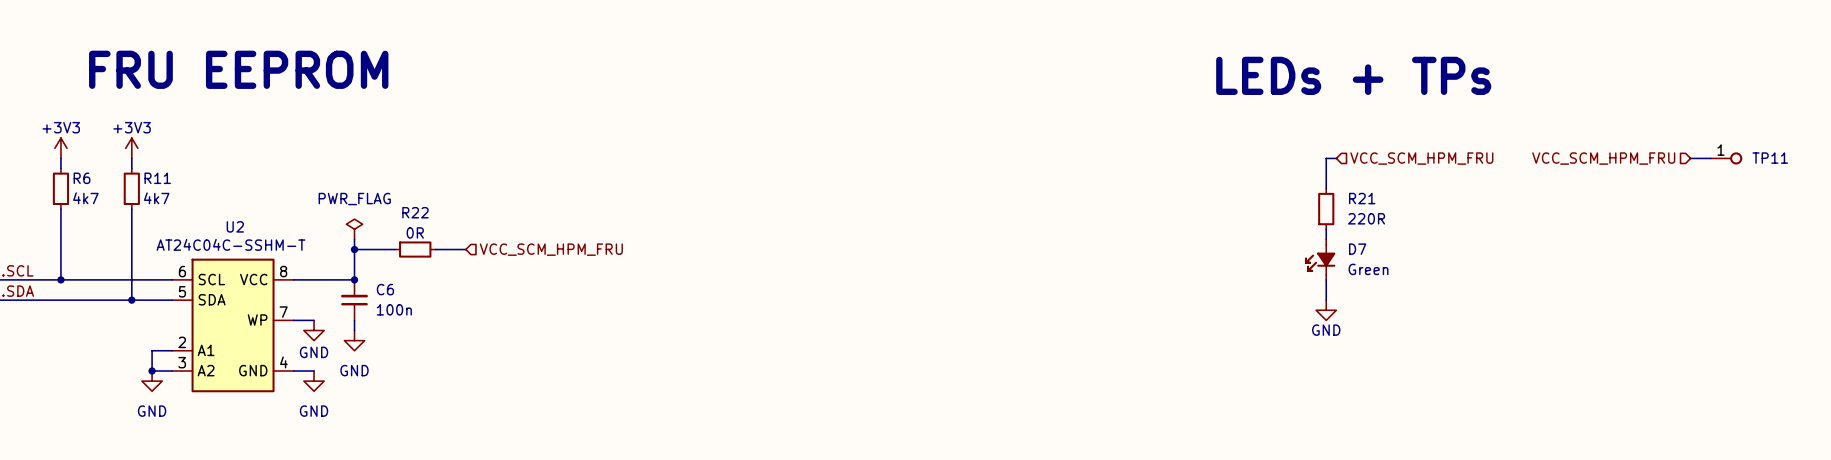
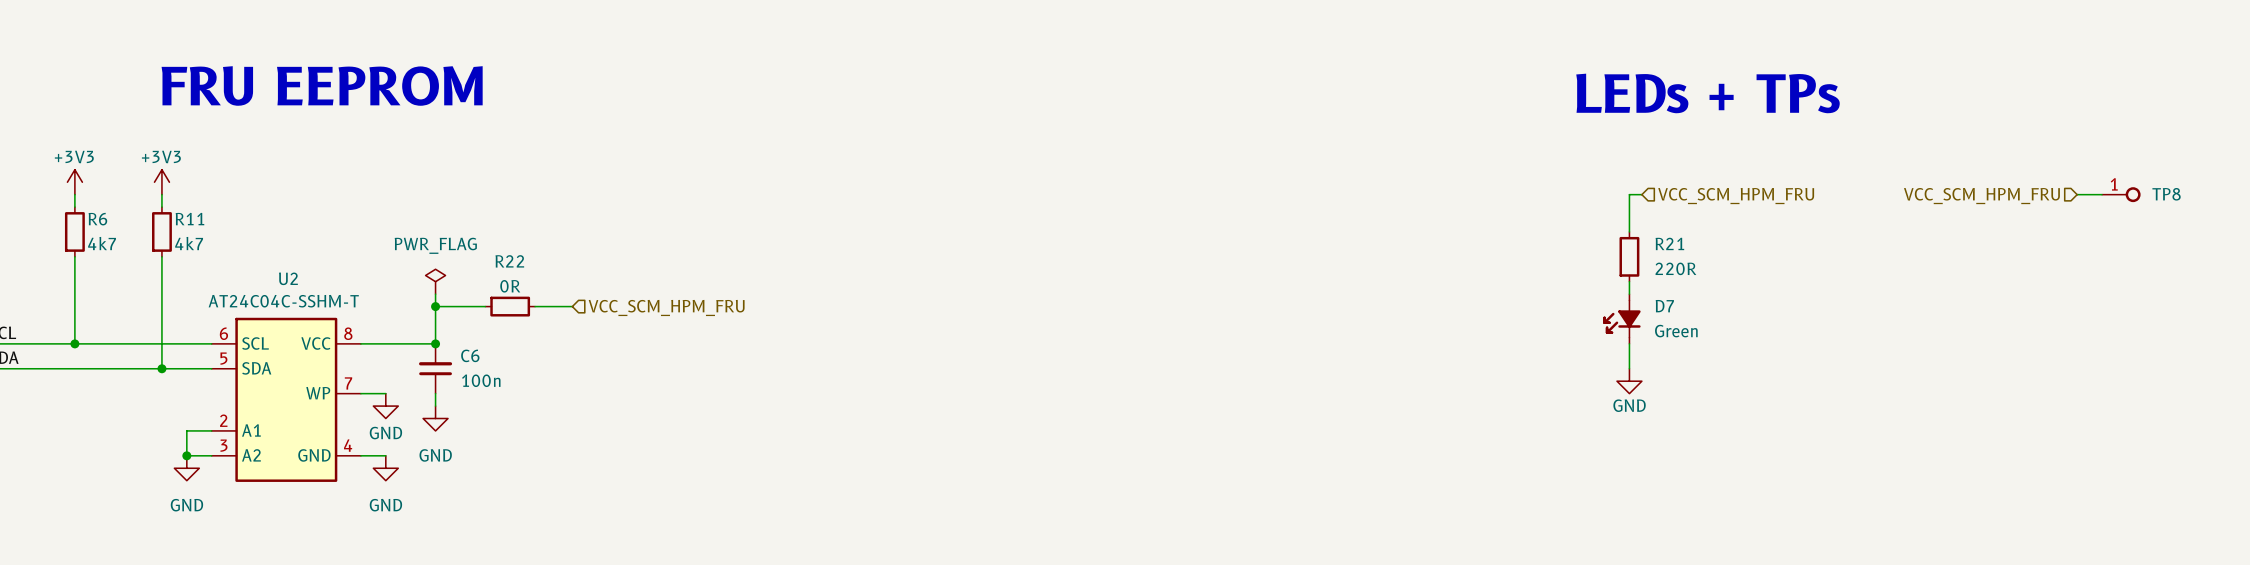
TP11 name: TP11 (1770, 158) -> TP8 (2166, 194)

